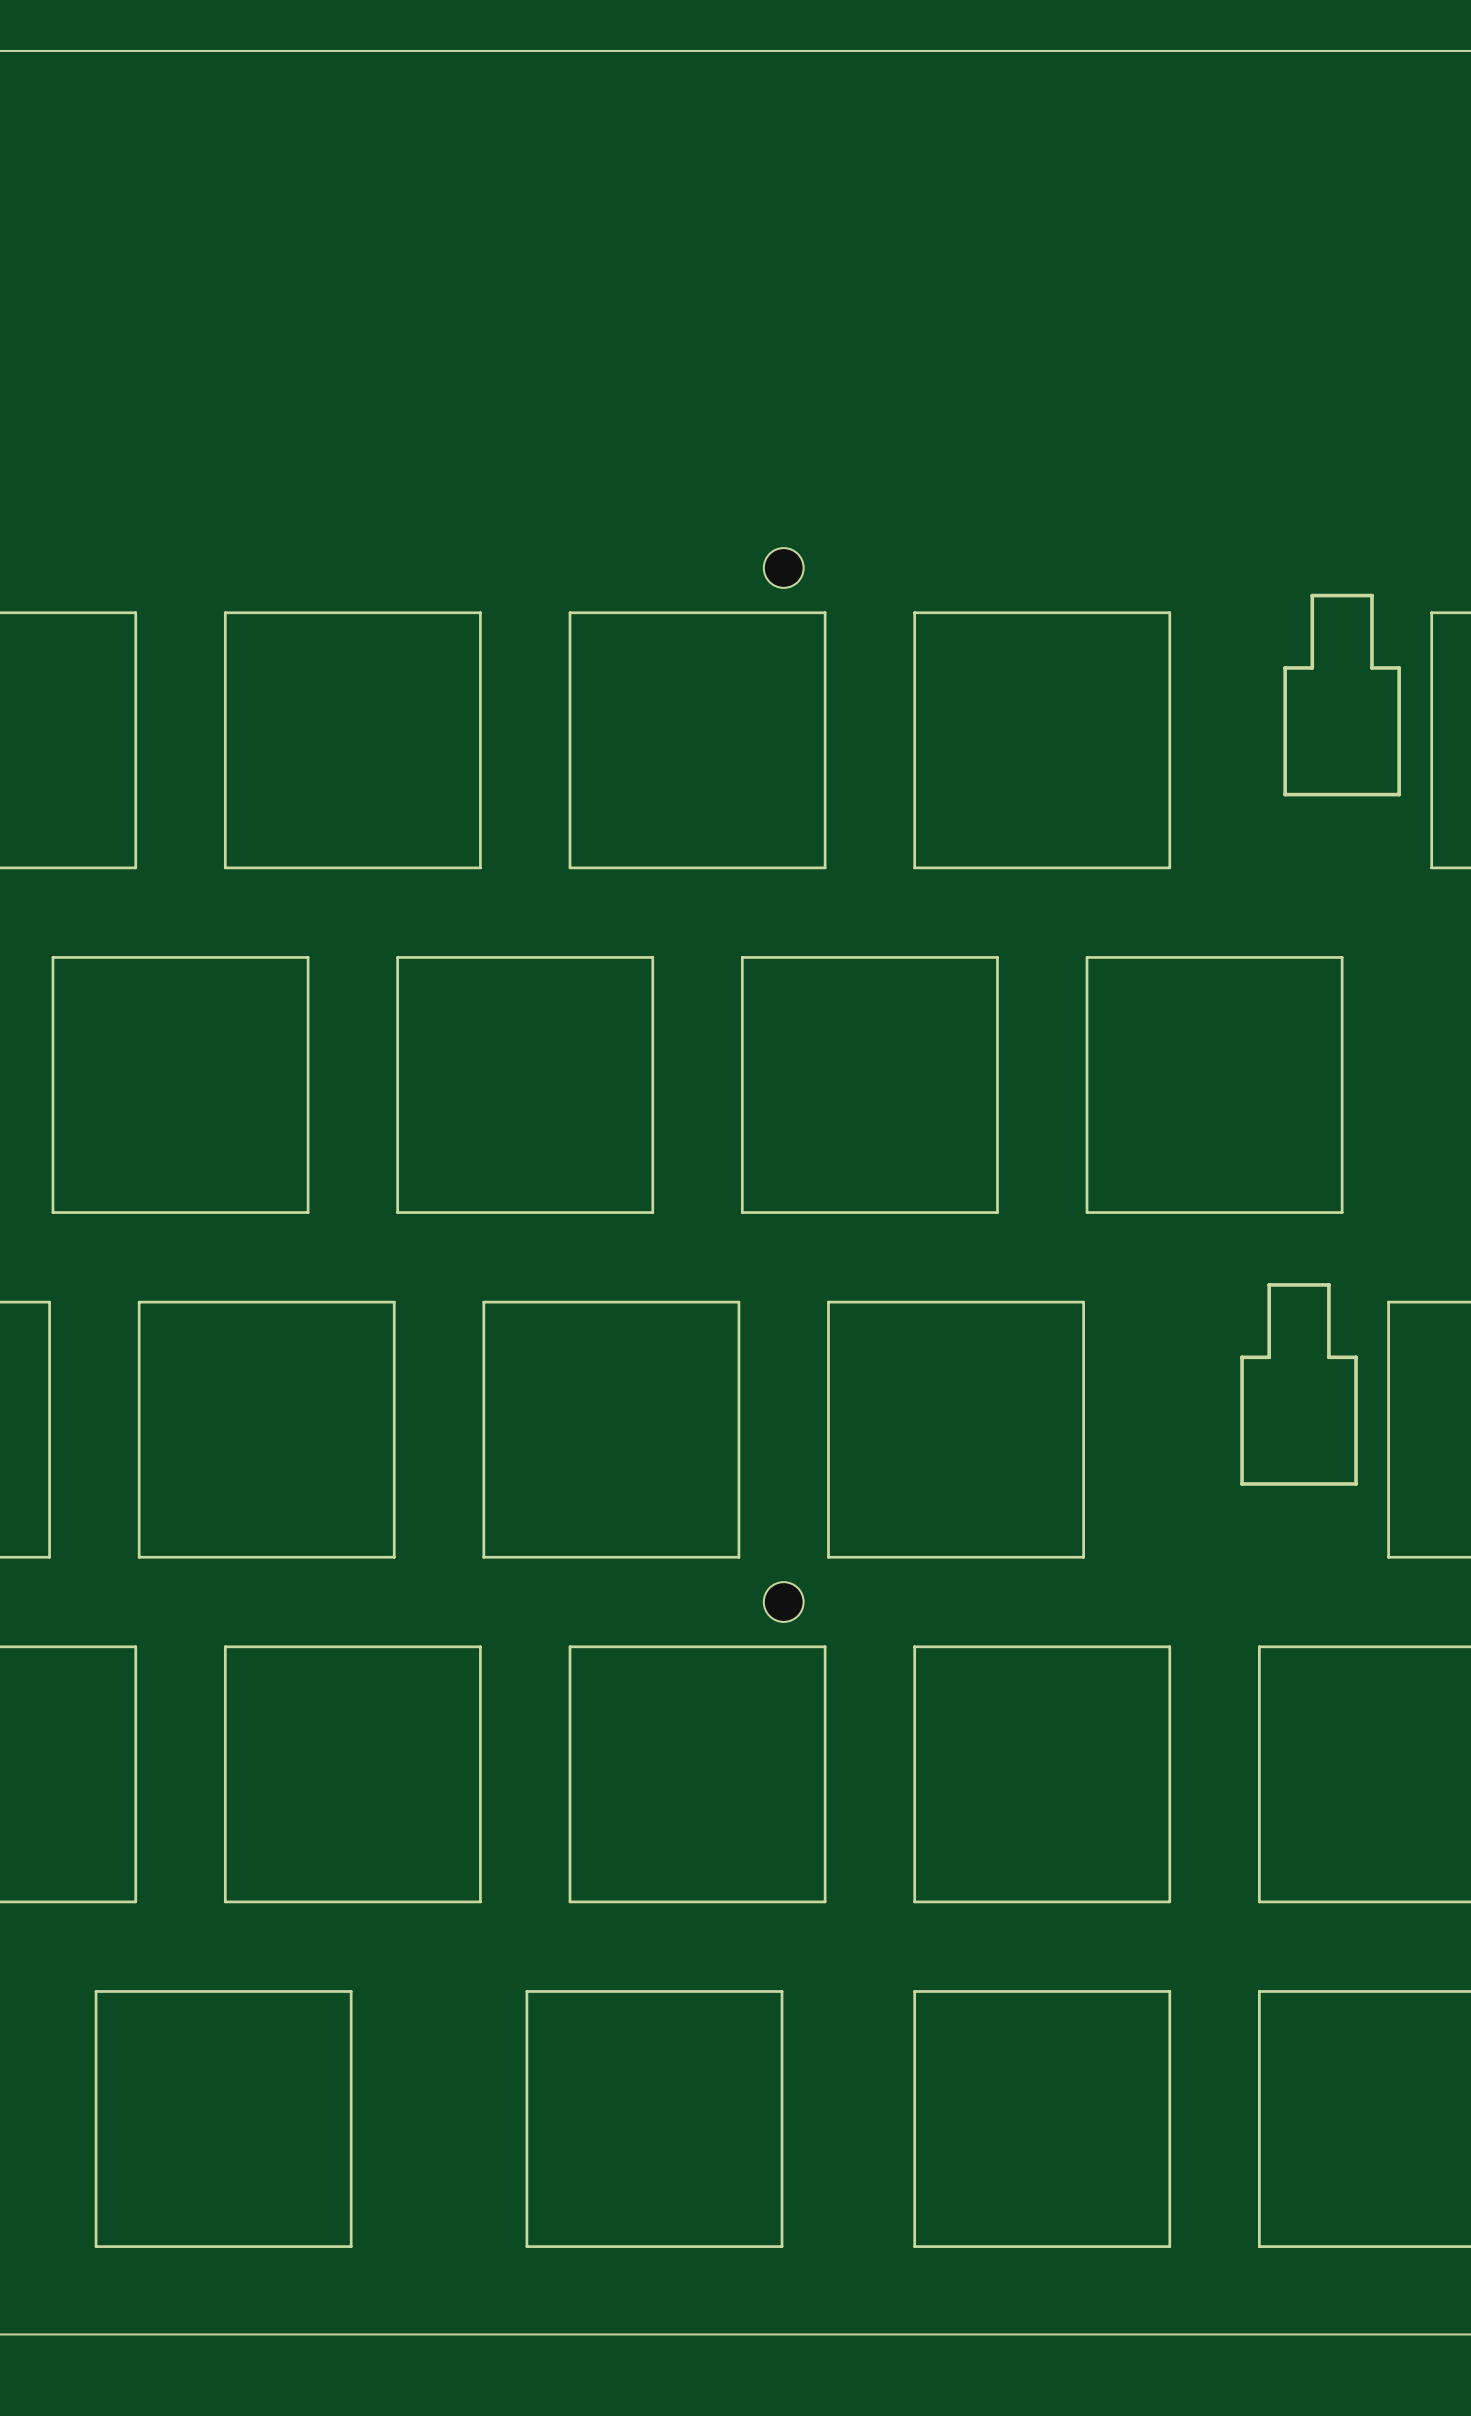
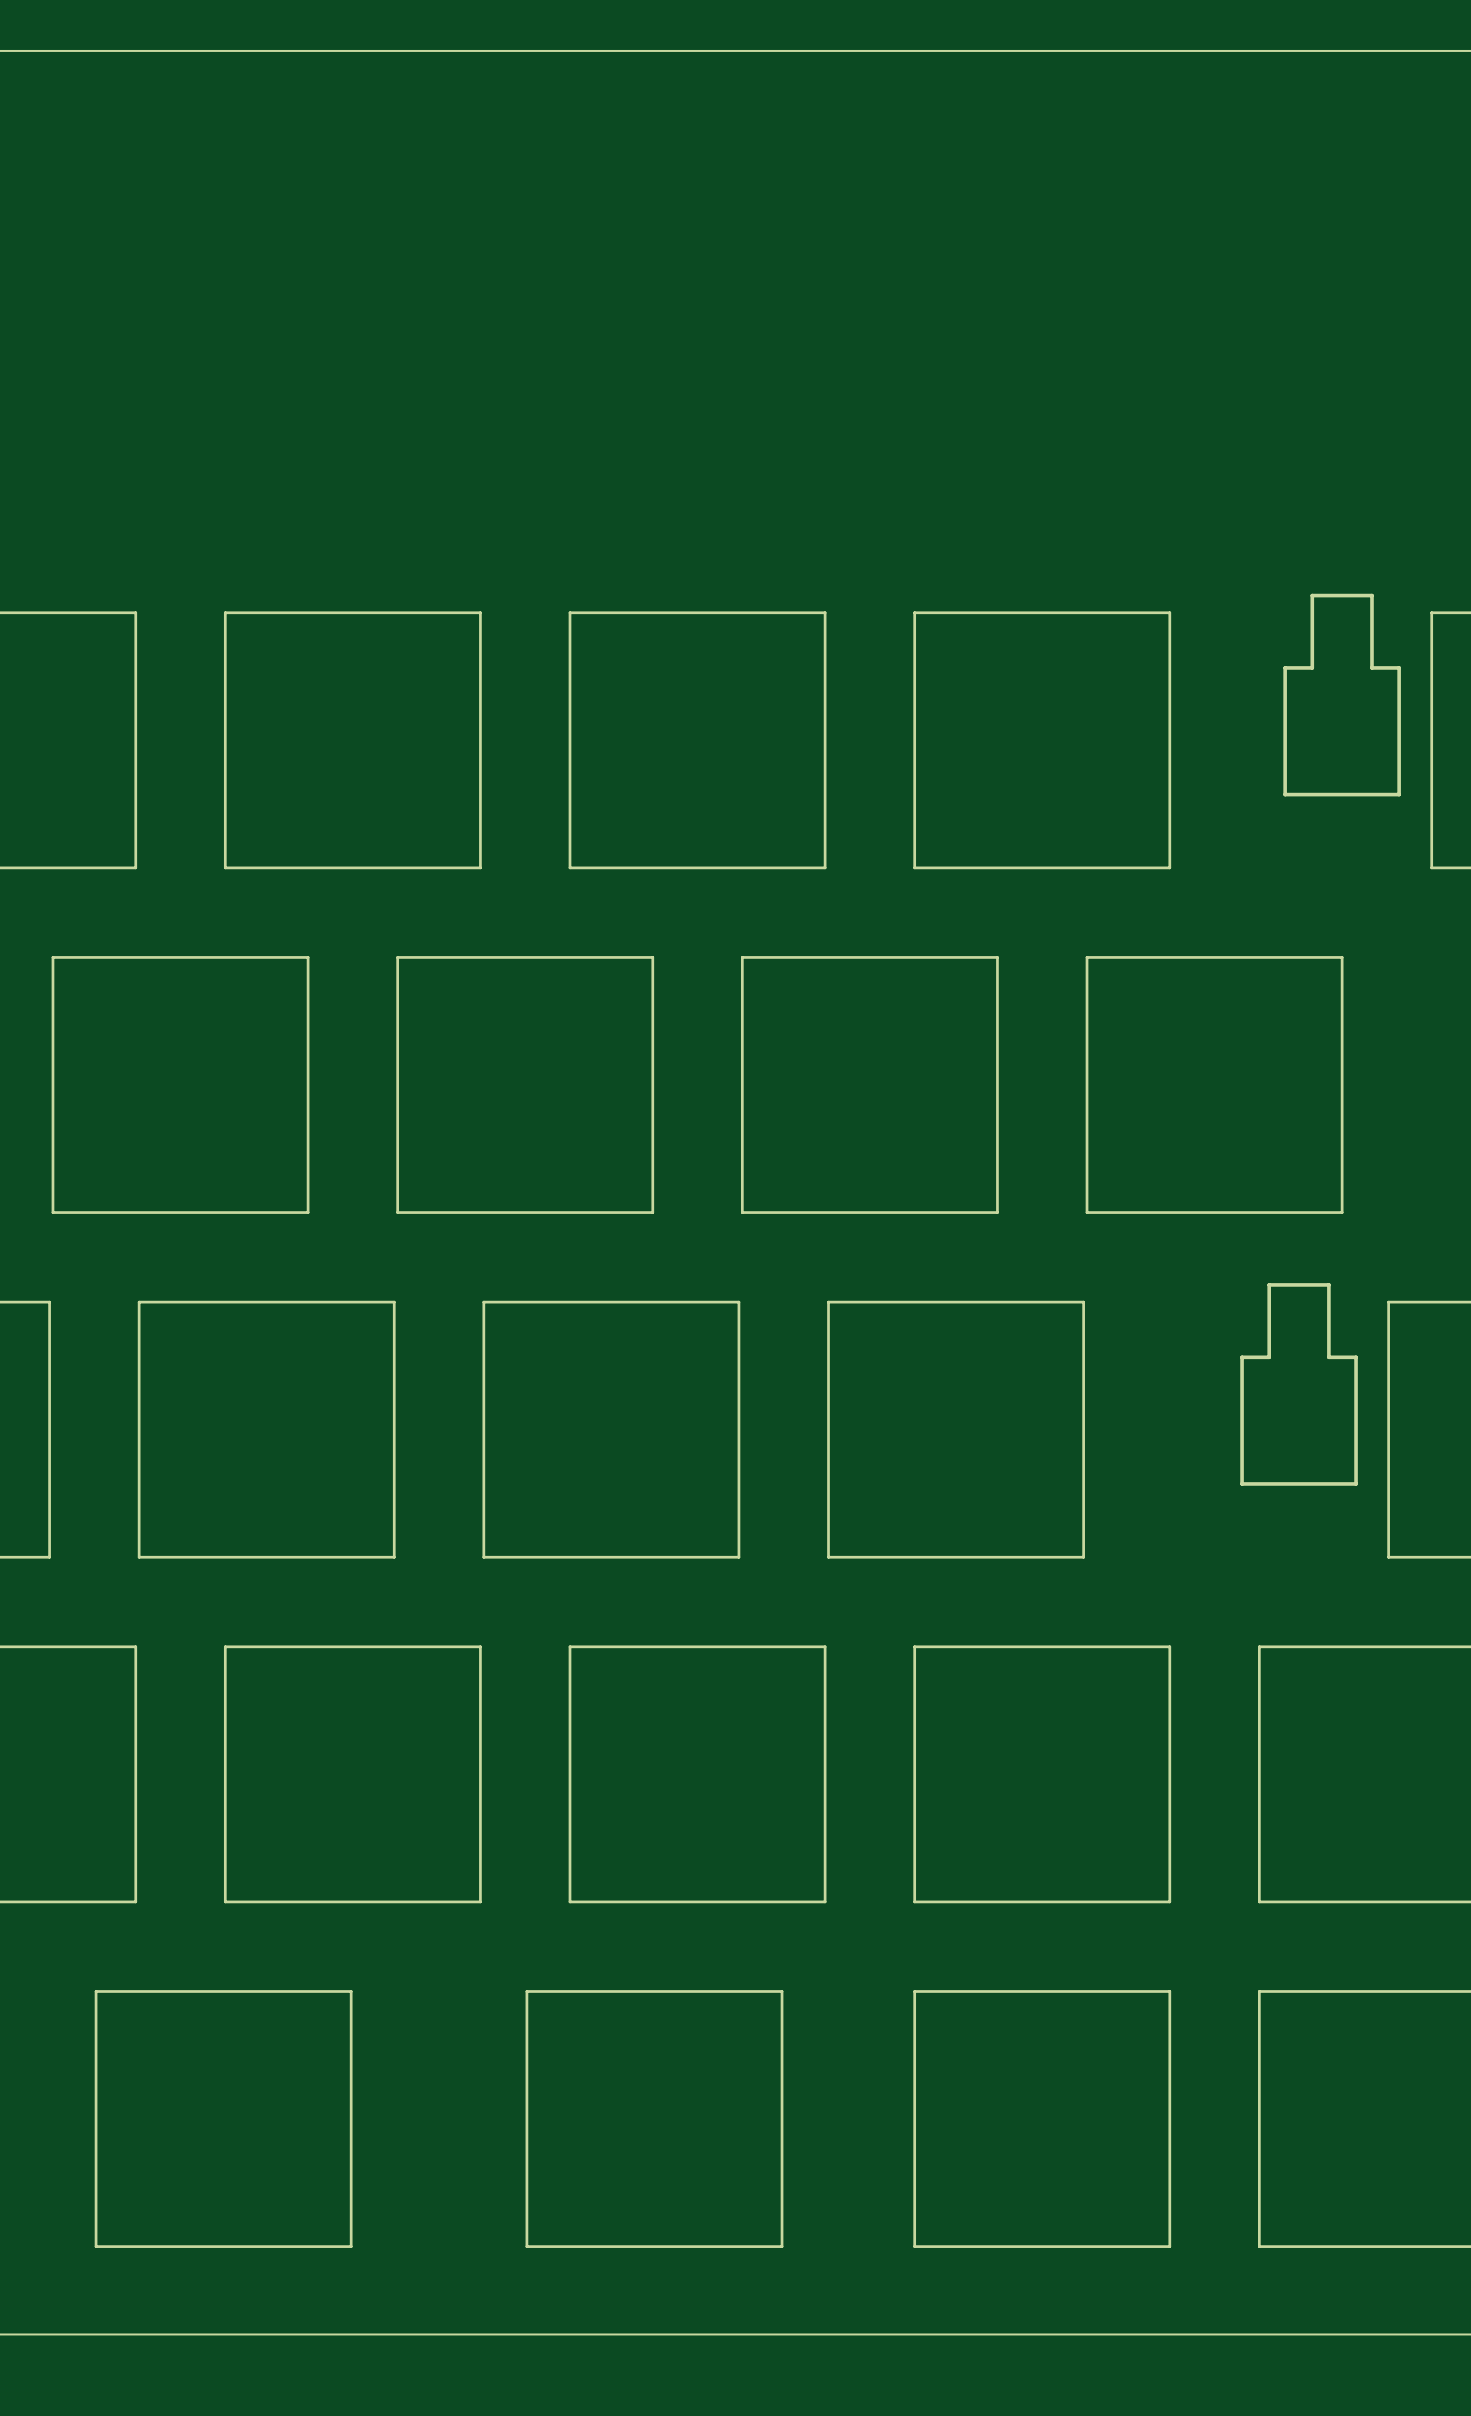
part: (783, 567) -> none
part: (783, 1602) -> none

